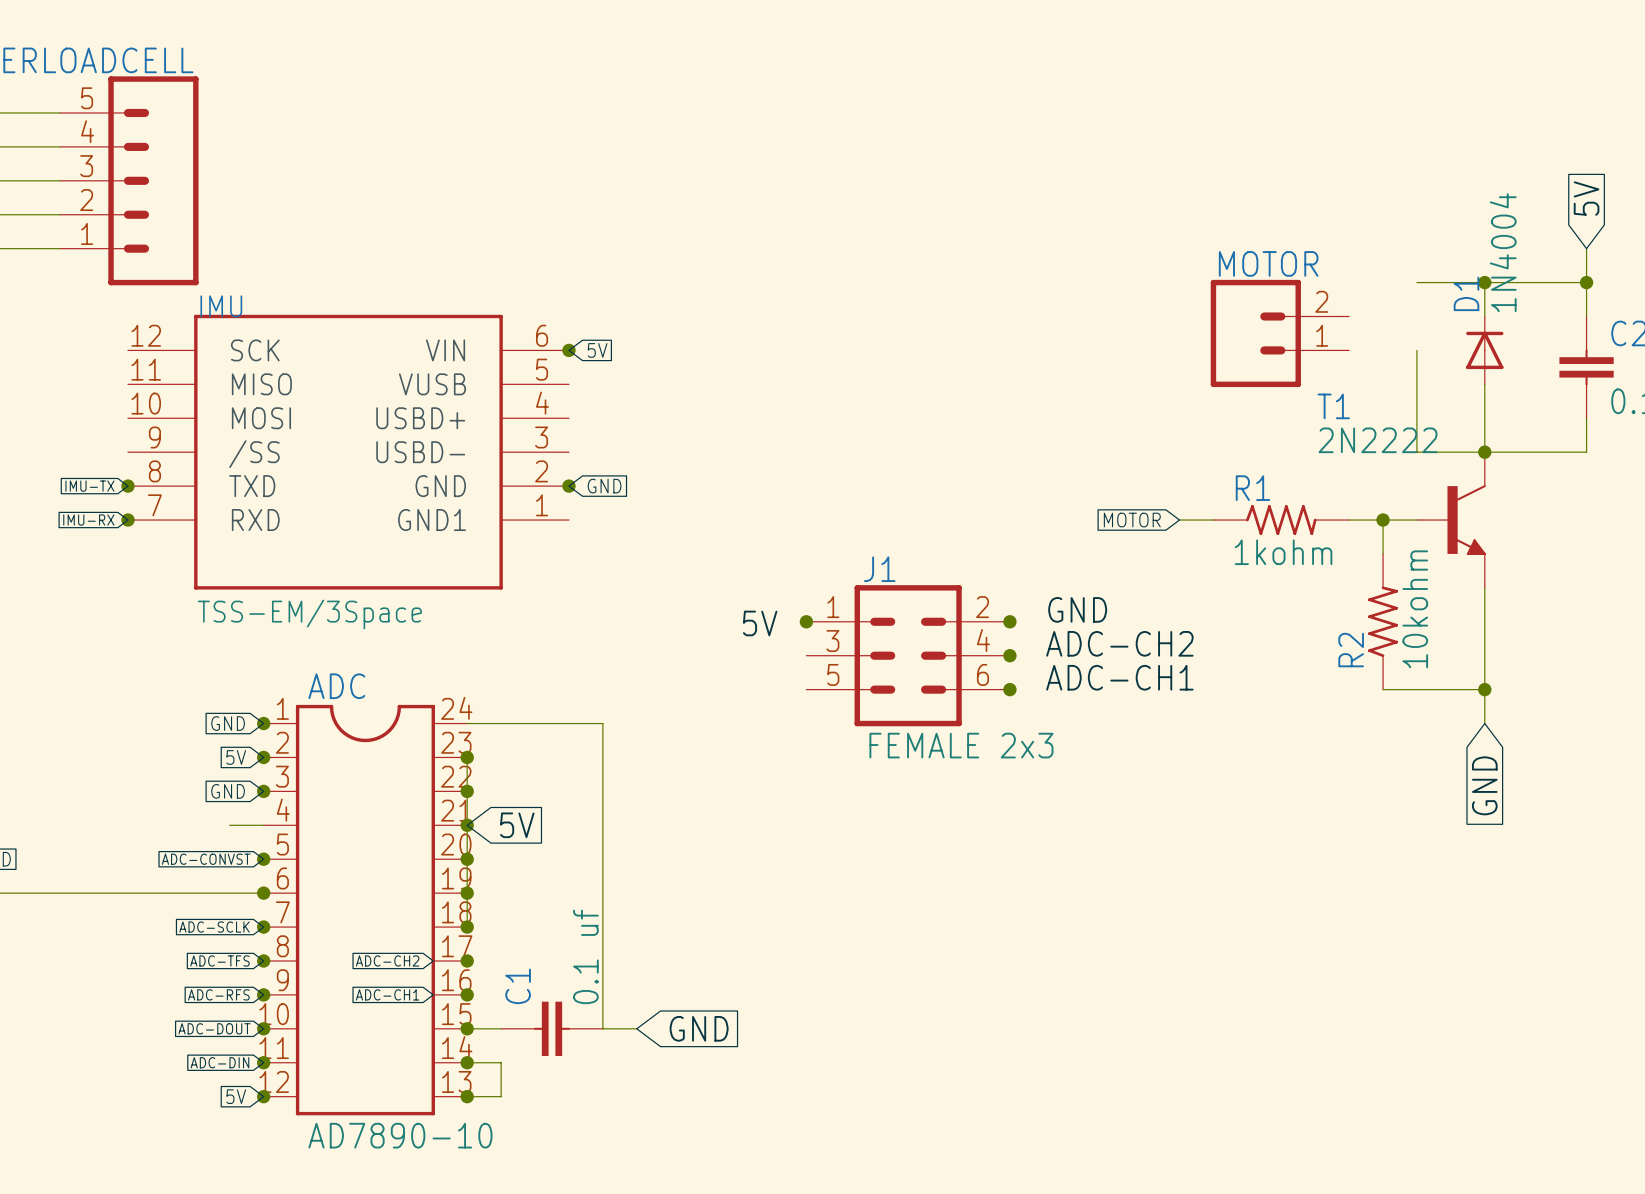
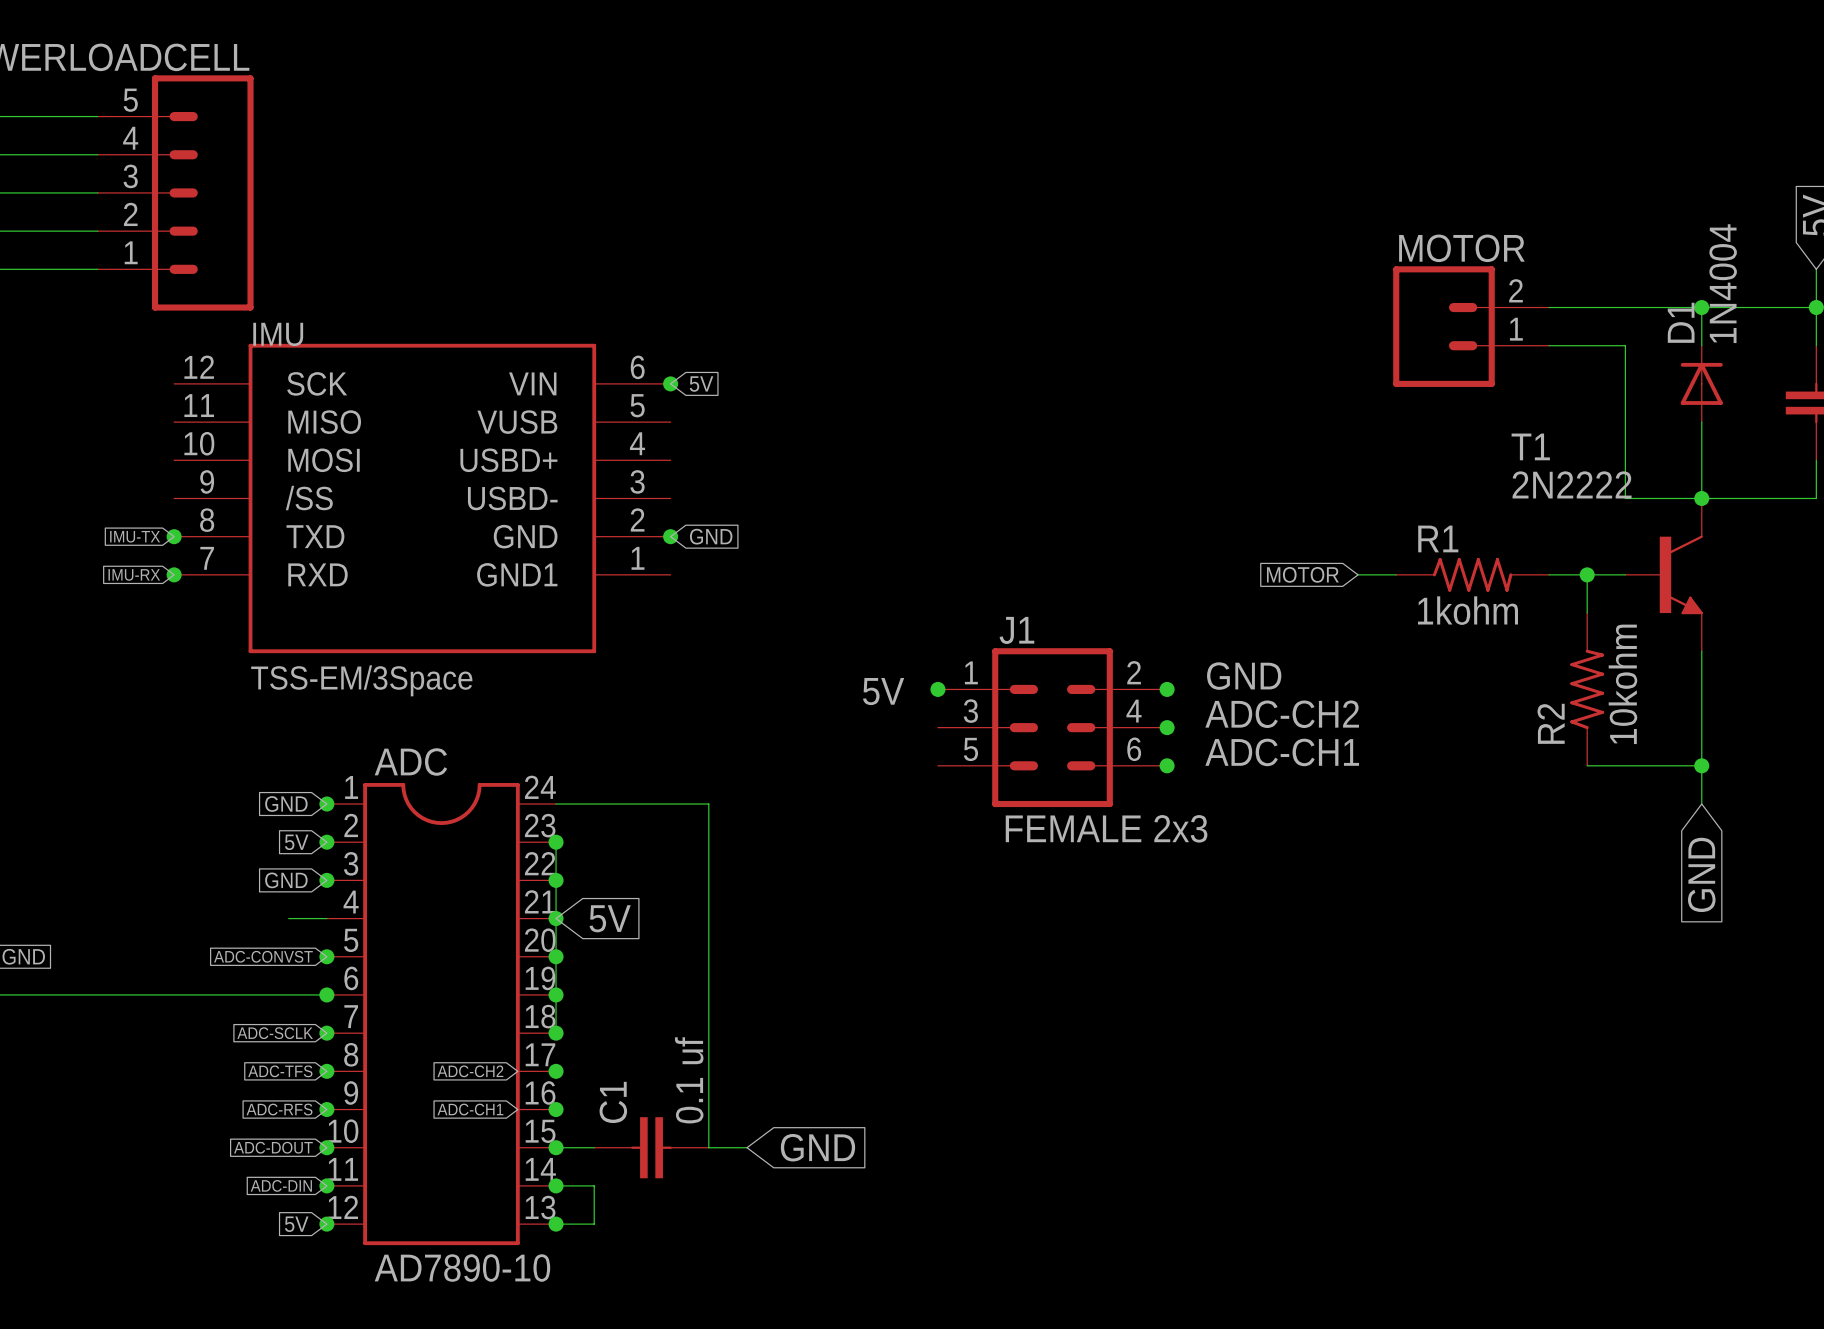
wire: none -> (1549, 307) (1625, 307)
wire: none -> (1549, 345) (1625, 345) (1625, 383)
MOTOR position: (1279, 333) -> (1471, 326)

